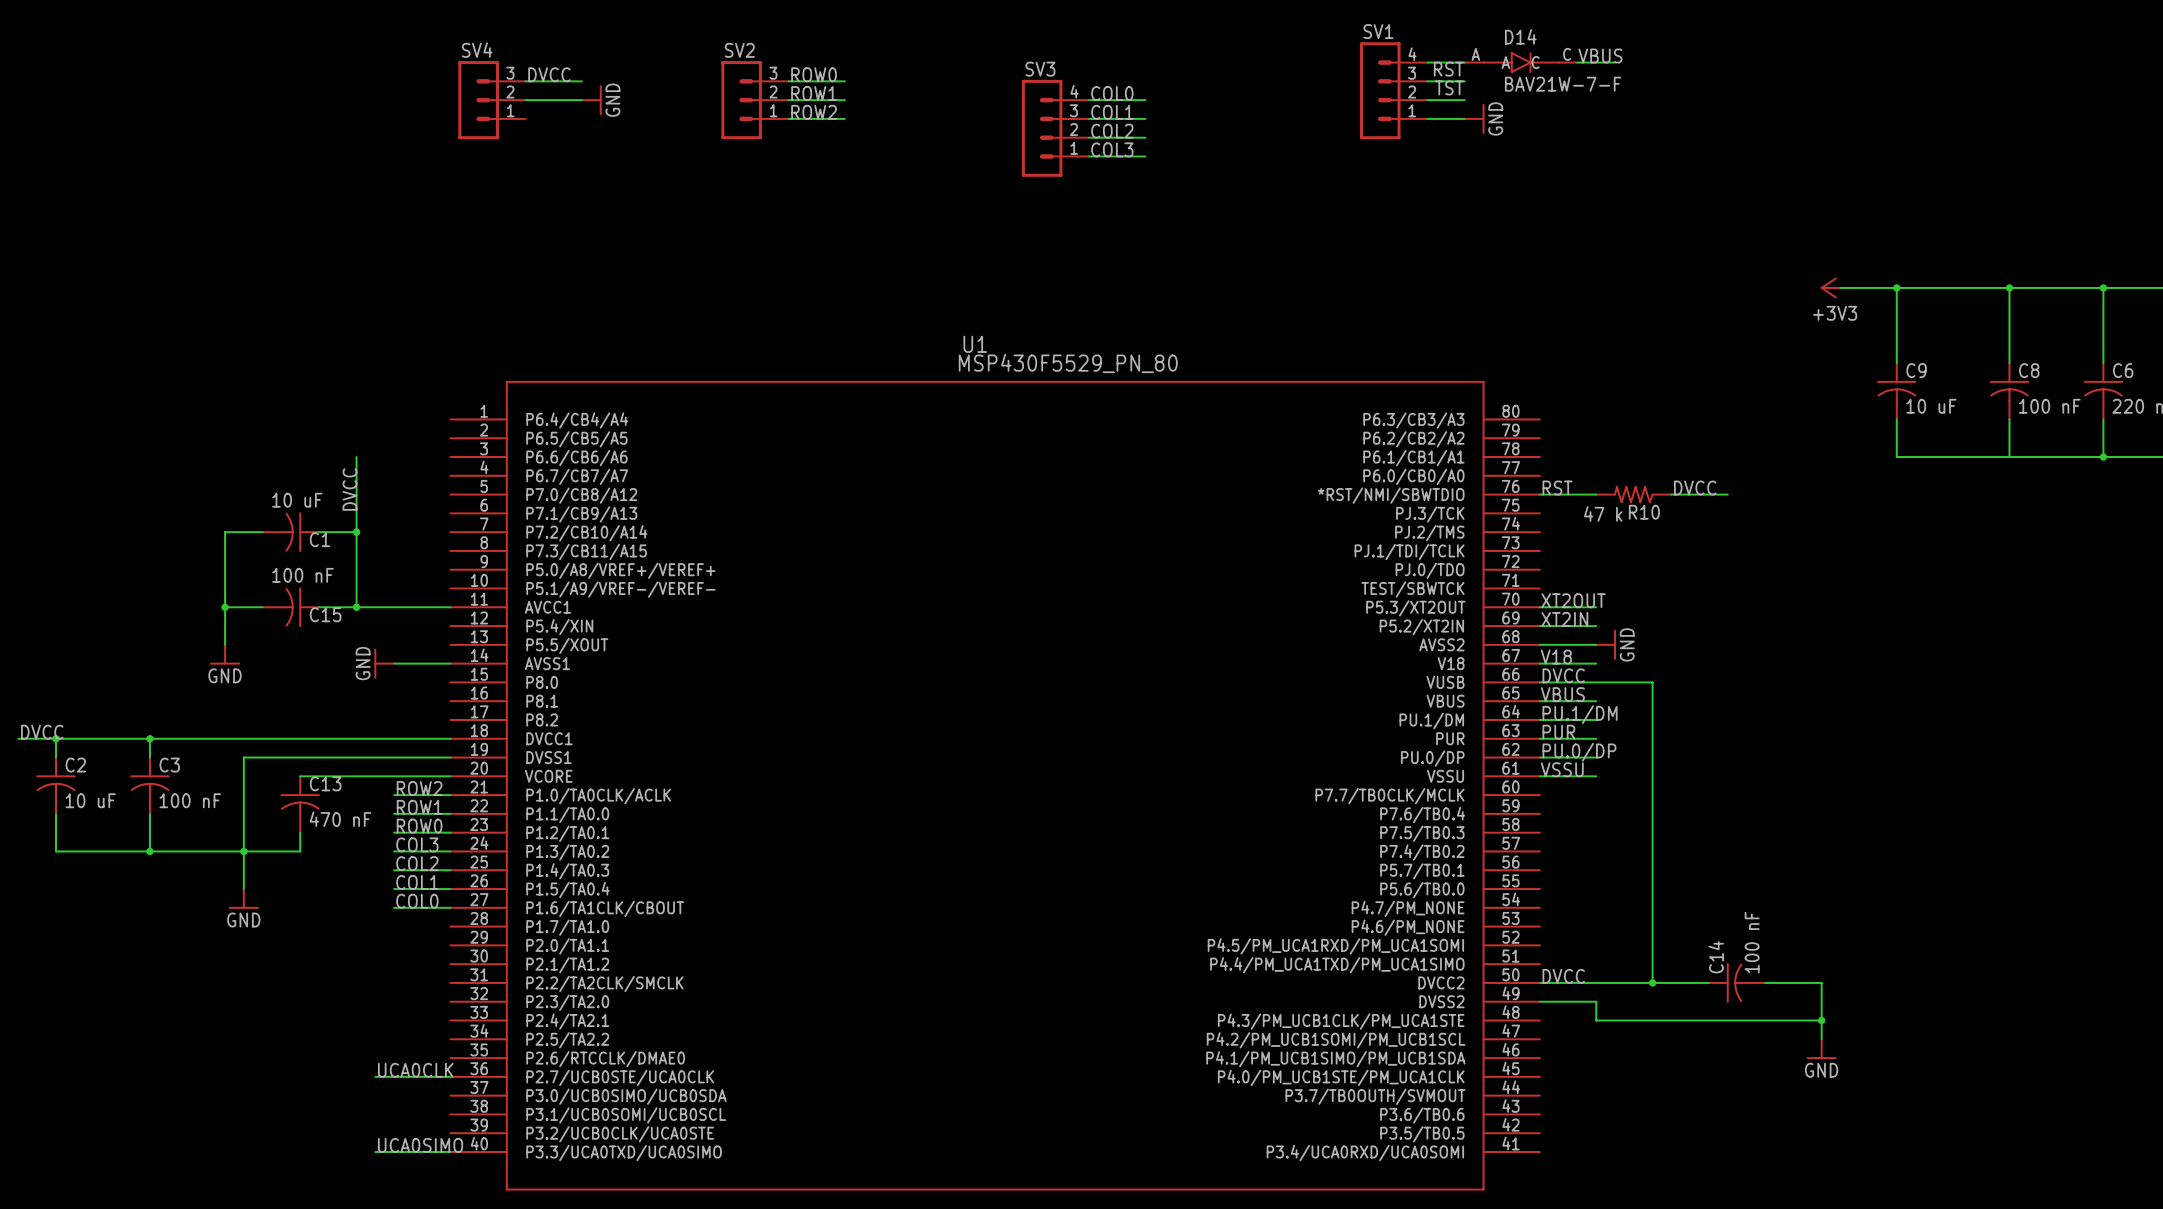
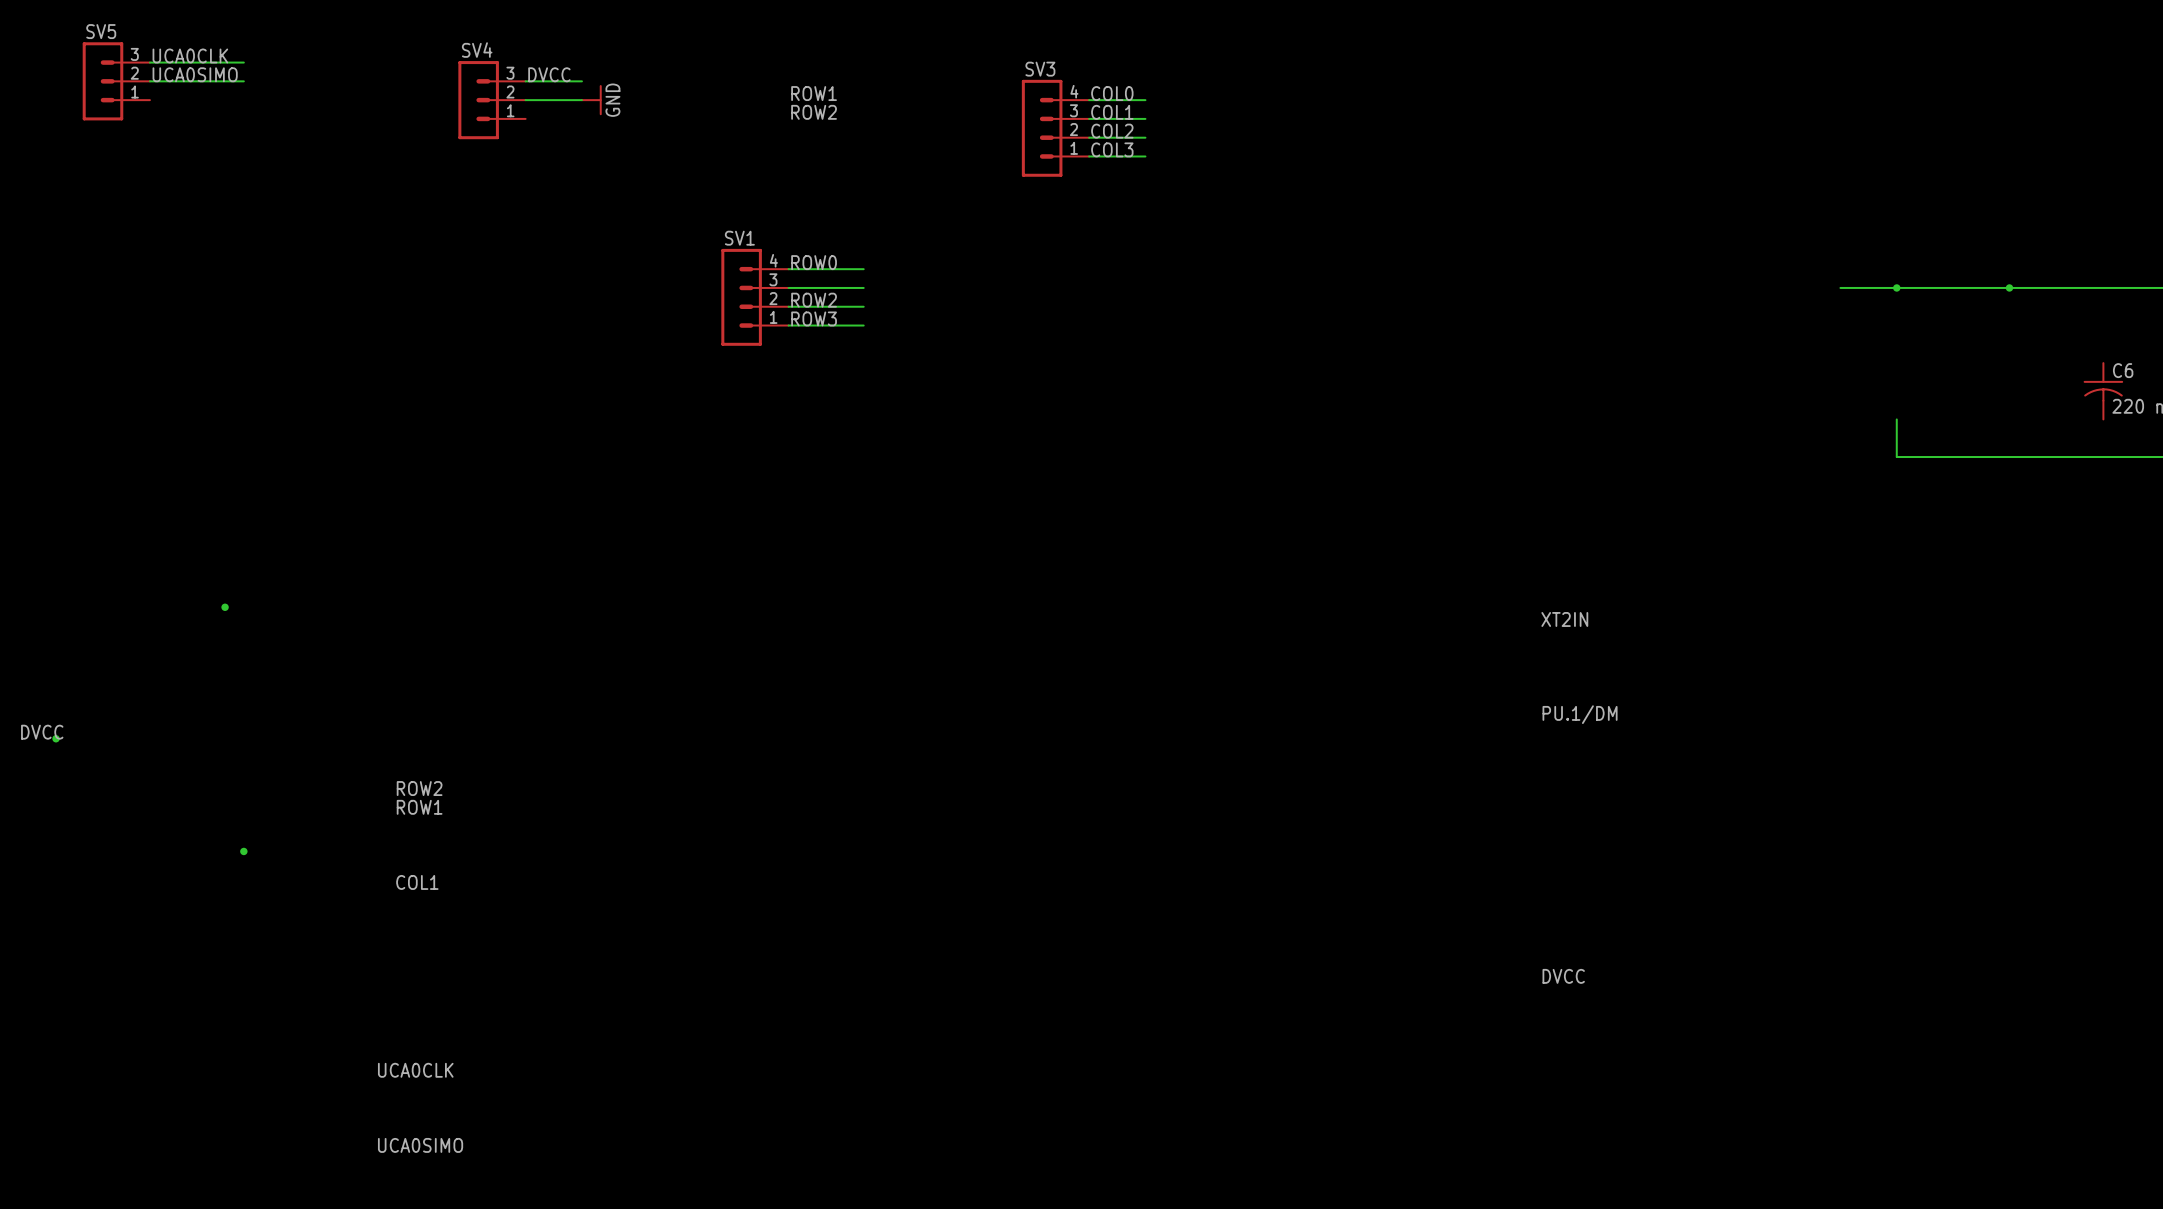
label: none -> UCA0CLK (190, 55)
label: VBUS (1600, 55) -> none
wire: none -> (149, 62) (243, 62)
wire: (1427, 62) (1464, 62) -> none
D14: BAV21W-7-F (1521, 62) -> none
wire: (1577, 62) (1615, 62) -> none
label: RST (1448, 69) -> none
label: none -> UCA0SIMO (195, 74)
label: ROW0 (814, 74) -> none
SV5: none -> (116, 81)
wire: none -> (149, 81) (243, 81)
wire: (788, 81) (844, 81) -> none
wire: (1427, 81) (1464, 81) -> none
label: TST (1449, 87) -> none
SV1 position: (1393, 90) -> (754, 297)
SV2: (754, 100) -> none
wire: (788, 100) (844, 100) -> none
wire: (1427, 100) (1464, 100) -> none
wire: (788, 118) (844, 118) -> none
wire: (1427, 118) (1464, 118) -> none
power symbol: GND (1474, 118) -> none
label: none -> ROW0 (814, 262)
wire: none -> (788, 269) (863, 269)
wire: none -> (788, 287) (863, 287)
power symbol: +3V3 (1830, 287) -> none
wire: (1896, 287) (1896, 363) -> none
wire: (2009, 287) (2009, 363) -> none
wire: (2103, 287) (2103, 363) -> none
junction: (2103, 287) -> none
label: none -> ROW2 (814, 300)
wire: none -> (788, 306) (863, 306)
label: none -> ROW3 (814, 318)
wire: none -> (788, 325) (863, 325)
C9: 10 uF (1896, 391) -> none
C8: 100 nF (2009, 391) -> none
wire: (2009, 419) (2009, 457) -> none
wire: (2103, 419) (2103, 457) -> none
wire: (356, 457) (356, 607) -> none
junction: (2103, 457) -> none
label: RST (1557, 488) -> none
label: DVCC (1695, 488) -> none
label: DVCC (349, 489) -> none
wire: (1539, 494) (1596, 494) -> none
R10: 47 k (1633, 494) -> none
wire: (1671, 494) (1727, 494) -> none
wire: (262, 532) (225, 532) (225, 644) -> none
C1: 10 uF (290, 532) -> none
wire: (318, 532) (356, 532) -> none
junction: (356, 532) -> none
label: XT2OUT (1573, 600) -> none
wire: (225, 607) (262, 607) -> none
C15: 100 nF (290, 607) -> none
wire: (318, 607) (450, 607) -> none
junction: (356, 607) -> none
wire: (1539, 607) (1596, 607) -> none
wire: (1539, 626) (1596, 626) -> none
wire: (1539, 644) (1596, 644) -> none
power symbol: GND (1606, 644) -> none
power symbol: GND (225, 654) -> none
label: V18 (1556, 657) -> none
power symbol: GND (384, 663) -> none
wire: (394, 663) (450, 663) -> none
wire: (1539, 663) (1596, 663) -> none
label: DVCC (1563, 675) -> none
wire: (1539, 682) (1652, 682) (1652, 982) -> none
label: VBUS (1562, 694) -> none
wire: (1539, 701) (1596, 701) -> none
wire: (1539, 719) (1596, 719) -> none
label: PUR (1558, 732) -> none
wire: (18, 738) (450, 738) -> none
wire: (56, 738) (56, 757) -> none
wire: (149, 738) (149, 757) -> none
junction: (149, 738) -> none
wire: (1539, 738) (1596, 738) -> none
label: PU.0/DP (1579, 752) -> none
wire: (450, 757) (243, 757) (243, 889) -> none
wire: (1539, 757) (1596, 757) -> none
label: VSSU (1562, 769) -> none
wire: (300, 776) (450, 776) -> none
wire: (1539, 776) (1596, 776) -> none
C2: 10 uF (56, 785) -> none
C3: 100 nF (149, 785) -> none
U1: MSP430F5529_PN_80 (995, 785) -> none
wire: (394, 795) (450, 795) -> none
C13: 470 nF (300, 804) -> none
wire: (56, 813) (56, 851) (300, 851) (300, 832) -> none
wire: (149, 813) (149, 851) -> none
wire: (394, 813) (450, 813) -> none
label: ROW0 (419, 826) -> none
wire: (394, 832) (450, 832) -> none
label: COL3 (417, 844) -> none
junction: (149, 851) -> none
wire: (394, 851) (450, 851) -> none
label: COL2 (417, 863) -> none
wire: (394, 870) (450, 870) -> none
wire: (394, 889) (450, 889) -> none
power symbol: GND (243, 898) -> none
label: COL0 (417, 901) -> none
wire: (394, 907) (450, 907) -> none
wire: (1539, 982) (1708, 982) -> none
junction: (1652, 982) -> none
C14: 100 nF (1737, 982) -> none
wire: (1765, 982) (1821, 982) (1821, 1039) -> none
wire: (1539, 1001) (1596, 1001) (1596, 1020) (1821, 1020) -> none
junction: (1821, 1020) -> none
power symbol: GND (1821, 1049) -> none
wire: (375, 1076) (450, 1076) -> none
wire: (375, 1151) (450, 1151) -> none

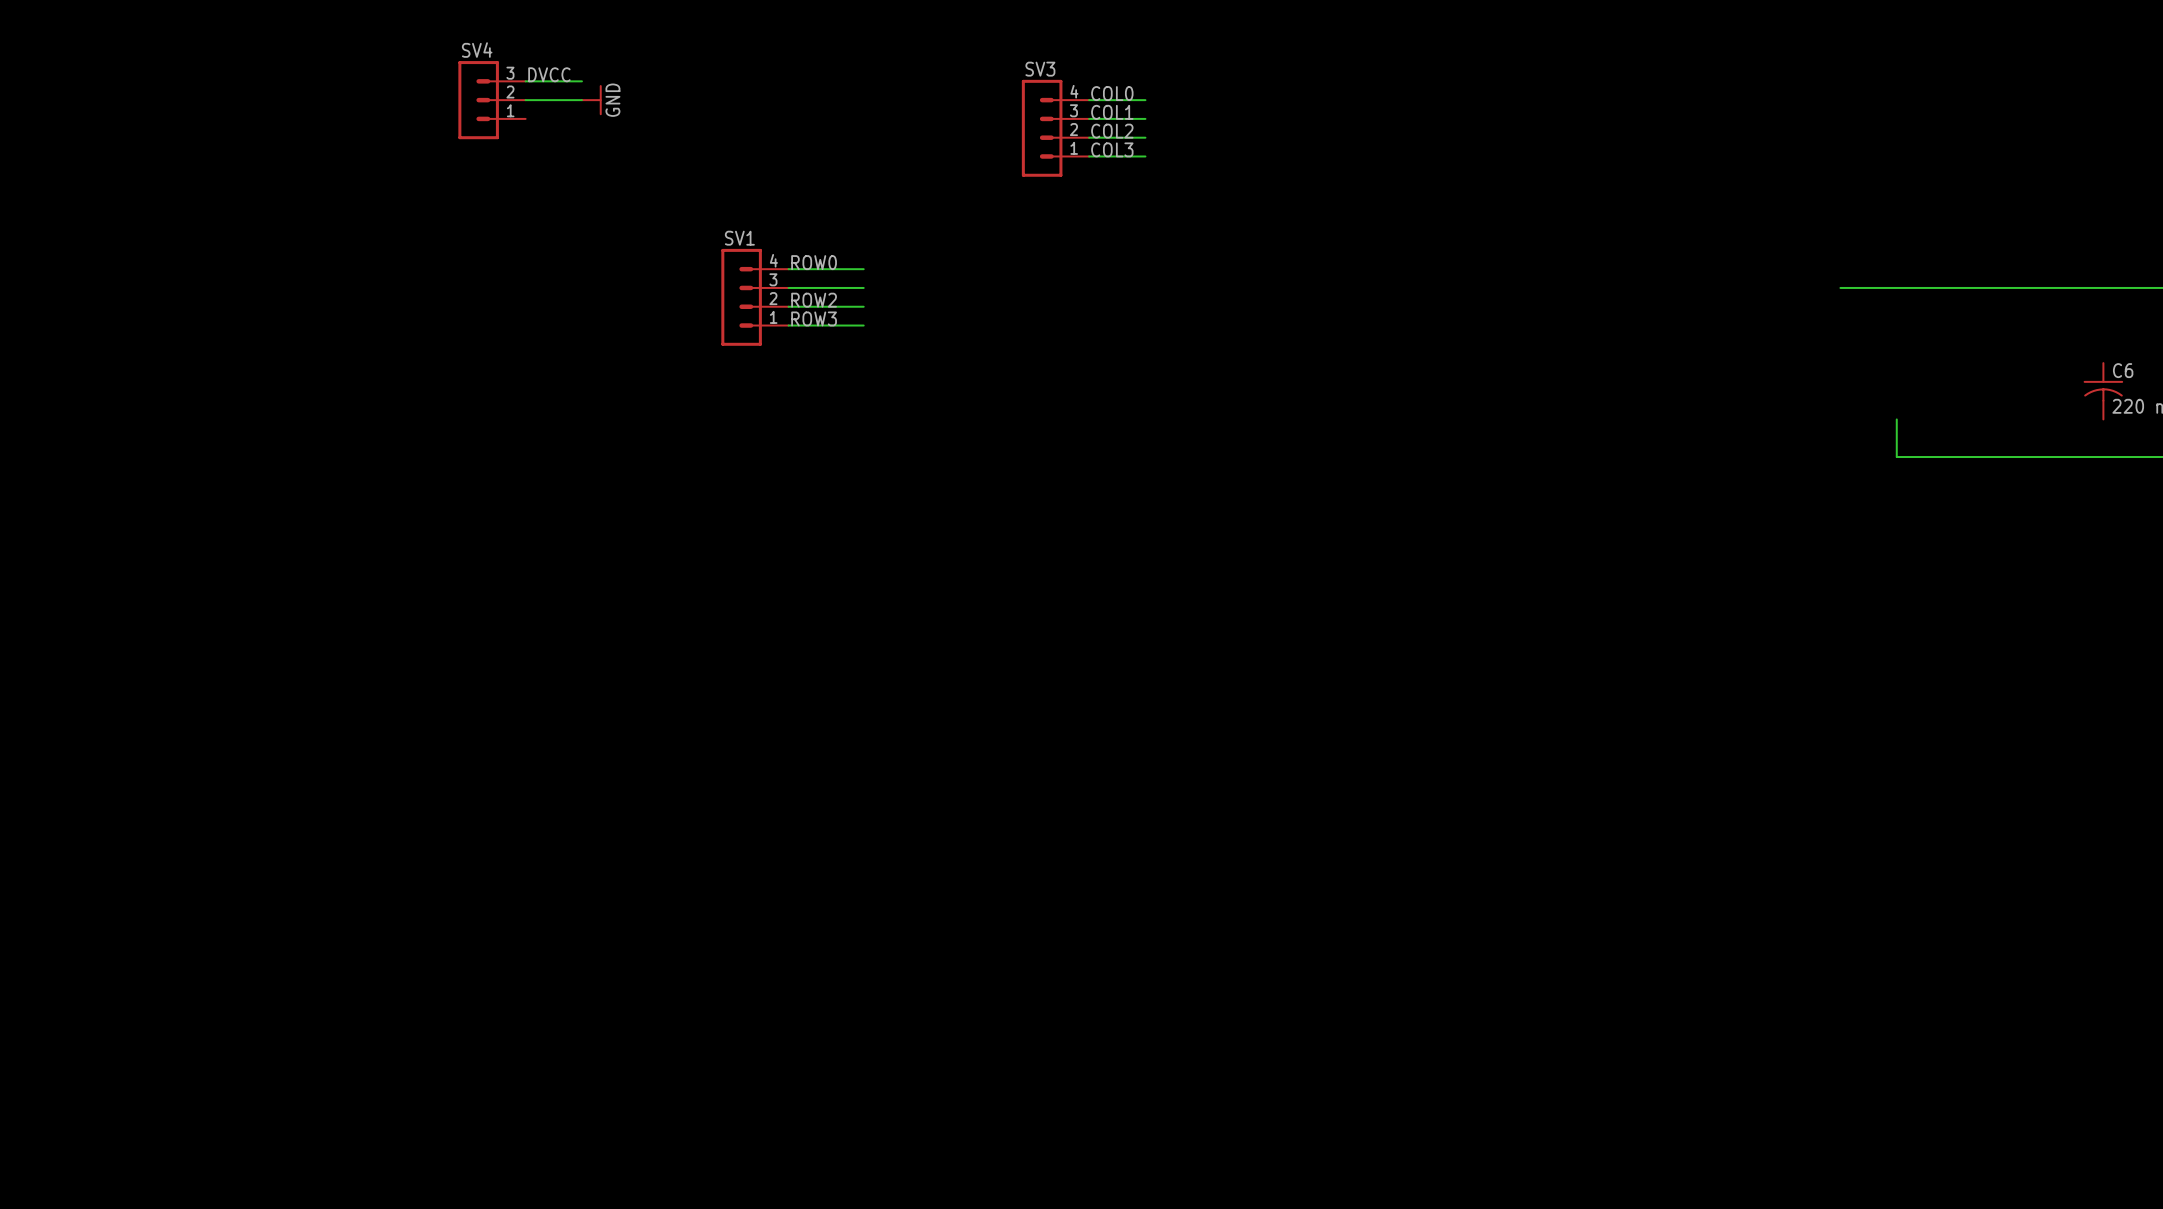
label: UCA0CLK (190, 55) -> none
wire: (149, 62) (243, 62) -> none
label: UCA0SIMO (195, 74) -> none
SV5: (116, 81) -> none
wire: (149, 81) (243, 81) -> none
label: ROW1 (814, 93) -> none
label: ROW2 (814, 112) -> none
junction: (1896, 287) -> none
junction: (2009, 287) -> none
junction: (225, 607) -> none
label: XT2IN (1564, 619) -> none
label: PU.1/DM (1580, 714) -> none
label: DVCC (42, 732) -> none
junction: (56, 738) -> none
label: ROW2 (419, 788) -> none
label: ROW1 (419, 807) -> none
junction: (243, 851) -> none
label: COL1 (417, 882) -> none
label: DVCC (1563, 976) -> none
label: UCA0CLK (415, 1070) -> none
label: UCA0SIMO (420, 1145) -> none

